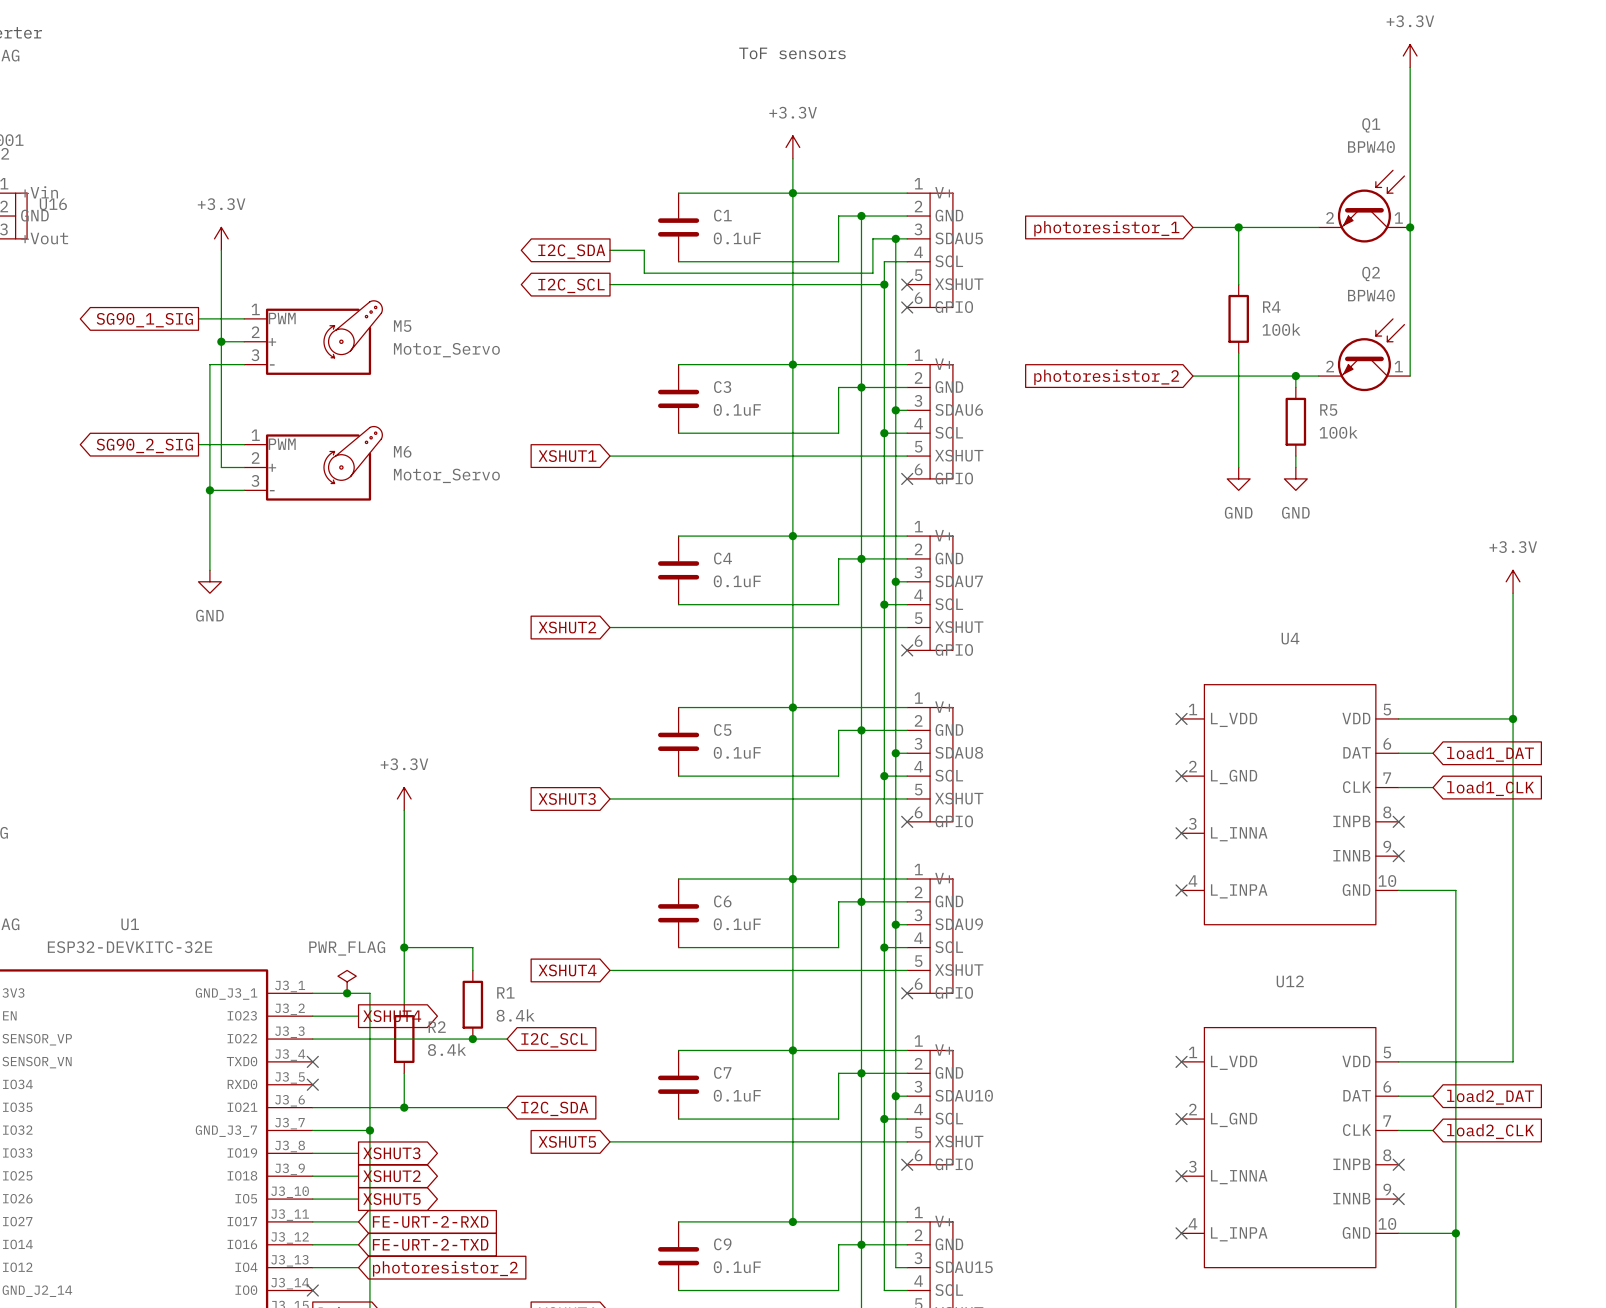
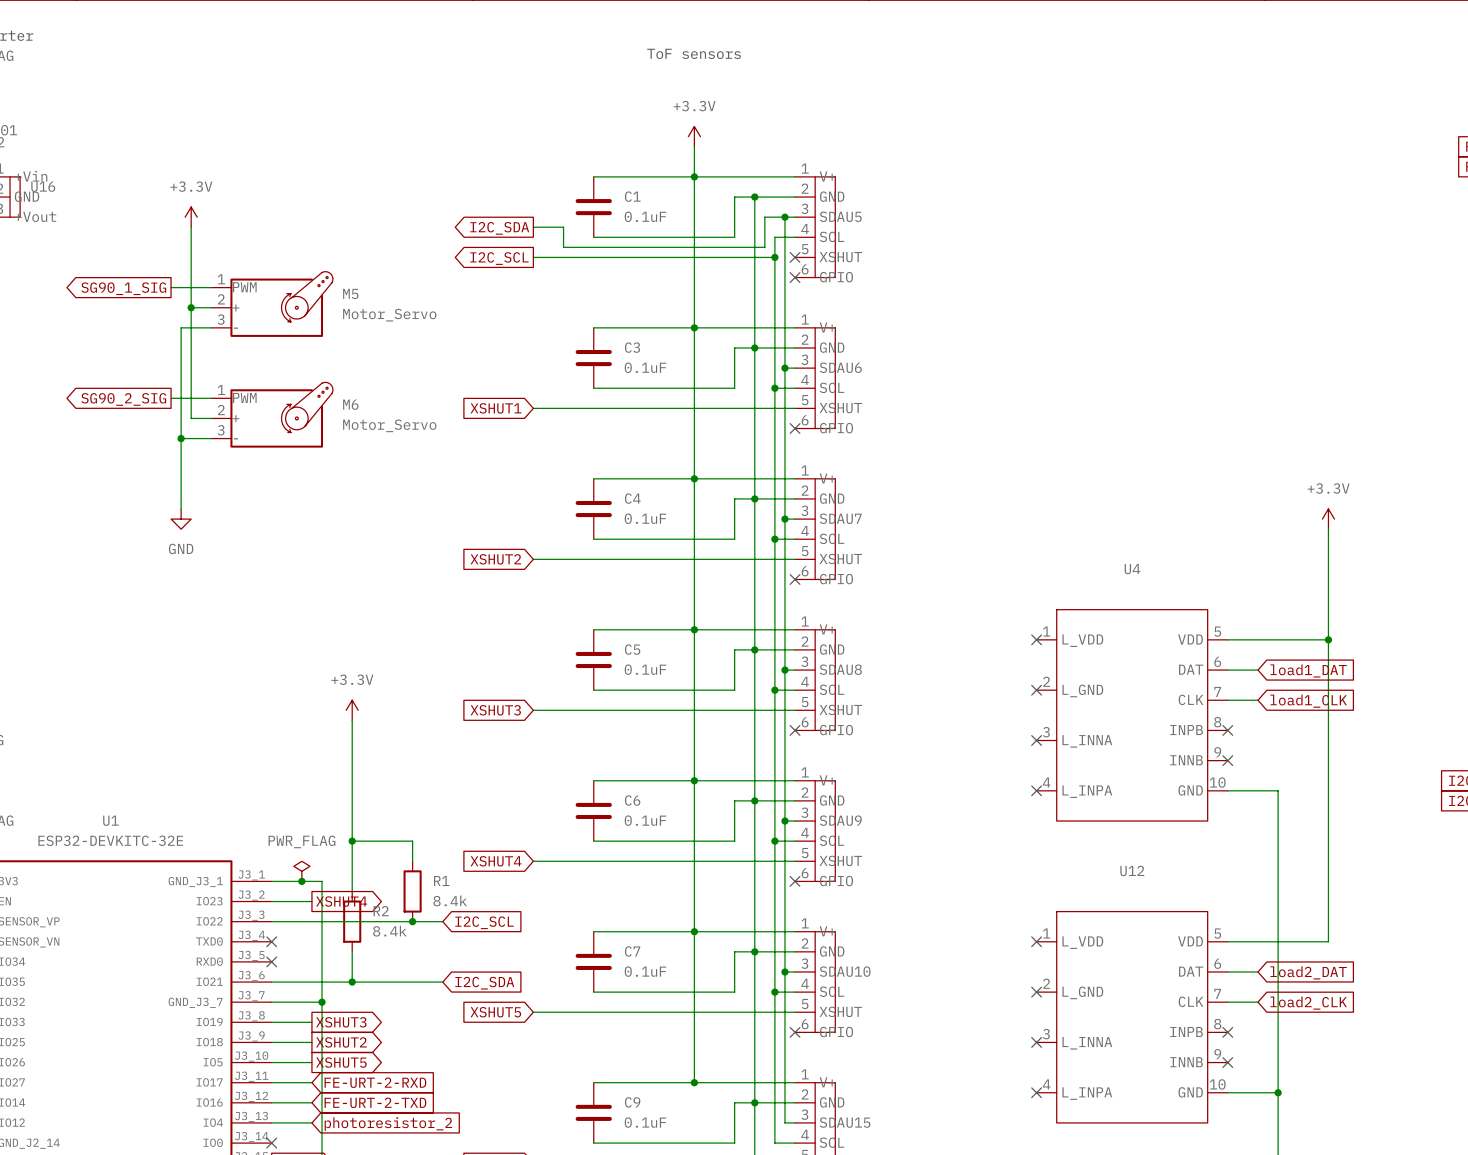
power symbol: +3.3V (1410, 55) -> none
wire: (1410, 67) (1410, 376) -> none
Q1: BPW40 (1364, 206) -> none
wire: (1192, 227) (1318, 227) -> none
wire: (1238, 227) (1238, 284) -> none
junction: (1238, 227) -> none
junction: (1410, 227) -> none
global label: photoresistor_1 (1106, 228) -> none
R4: 100k (1238, 318) -> none
wire: (1238, 353) (1238, 467) -> none
Q2: BPW40 (1364, 355) -> none
wire: (1192, 376) (1318, 376) -> none
wire: (1295, 376) (1295, 387) -> none
junction: (1295, 376) -> none
global label: photoresistor_2 (1106, 377) -> none
R5: 100k (1295, 421) -> none
wire: (1295, 456) (1295, 467) -> none
power symbol: GND (1238, 478) -> none
power symbol: GND (1295, 478) -> none

